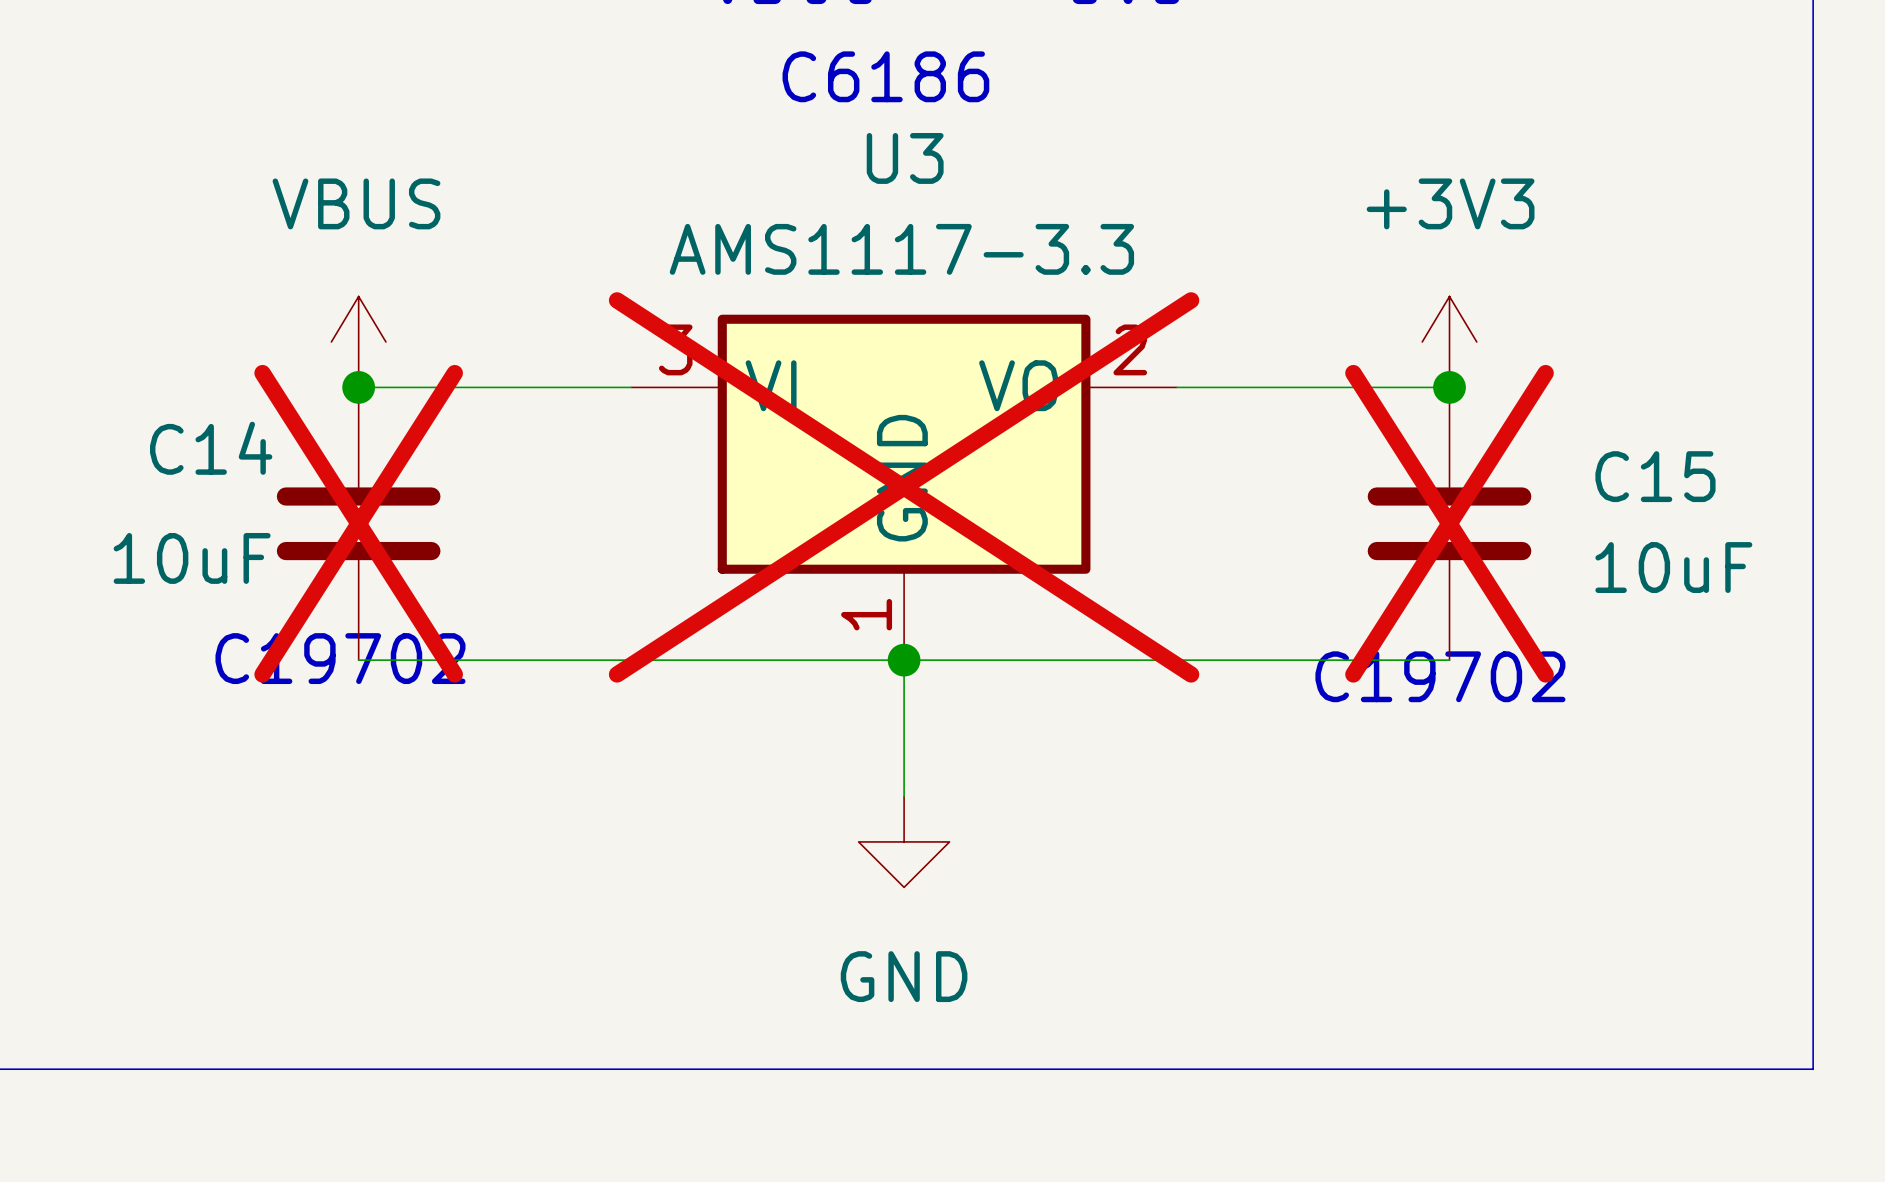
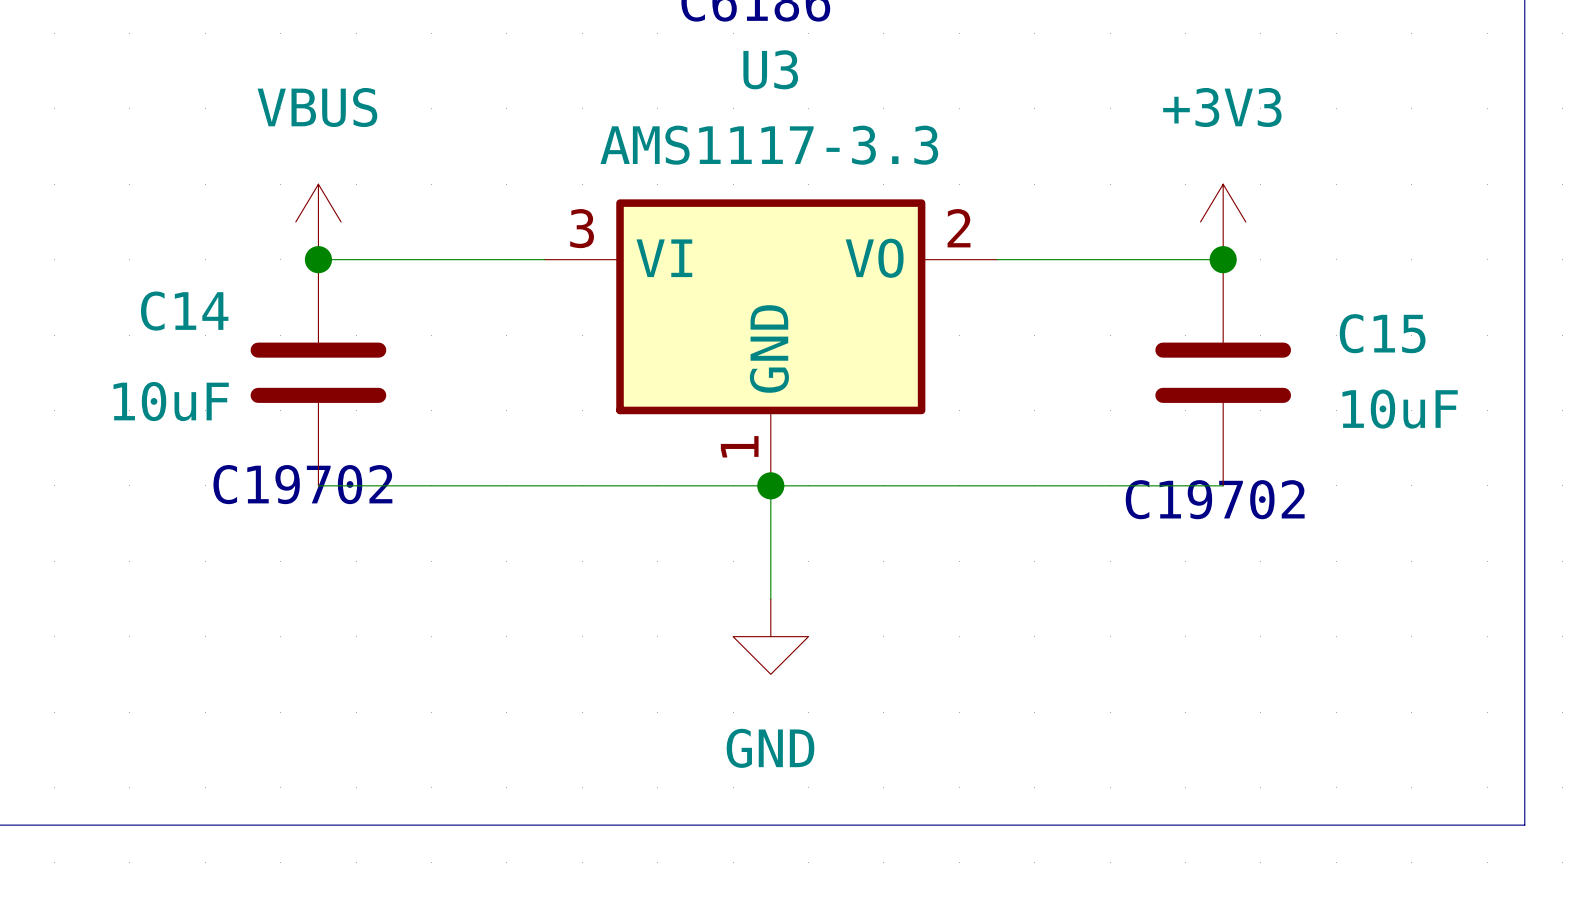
U3 do-not-place cross: (904, 487) -> none
C14 do-not-place cross: (358, 523) -> none
C15 do-not-place cross: (1449, 523) -> none

